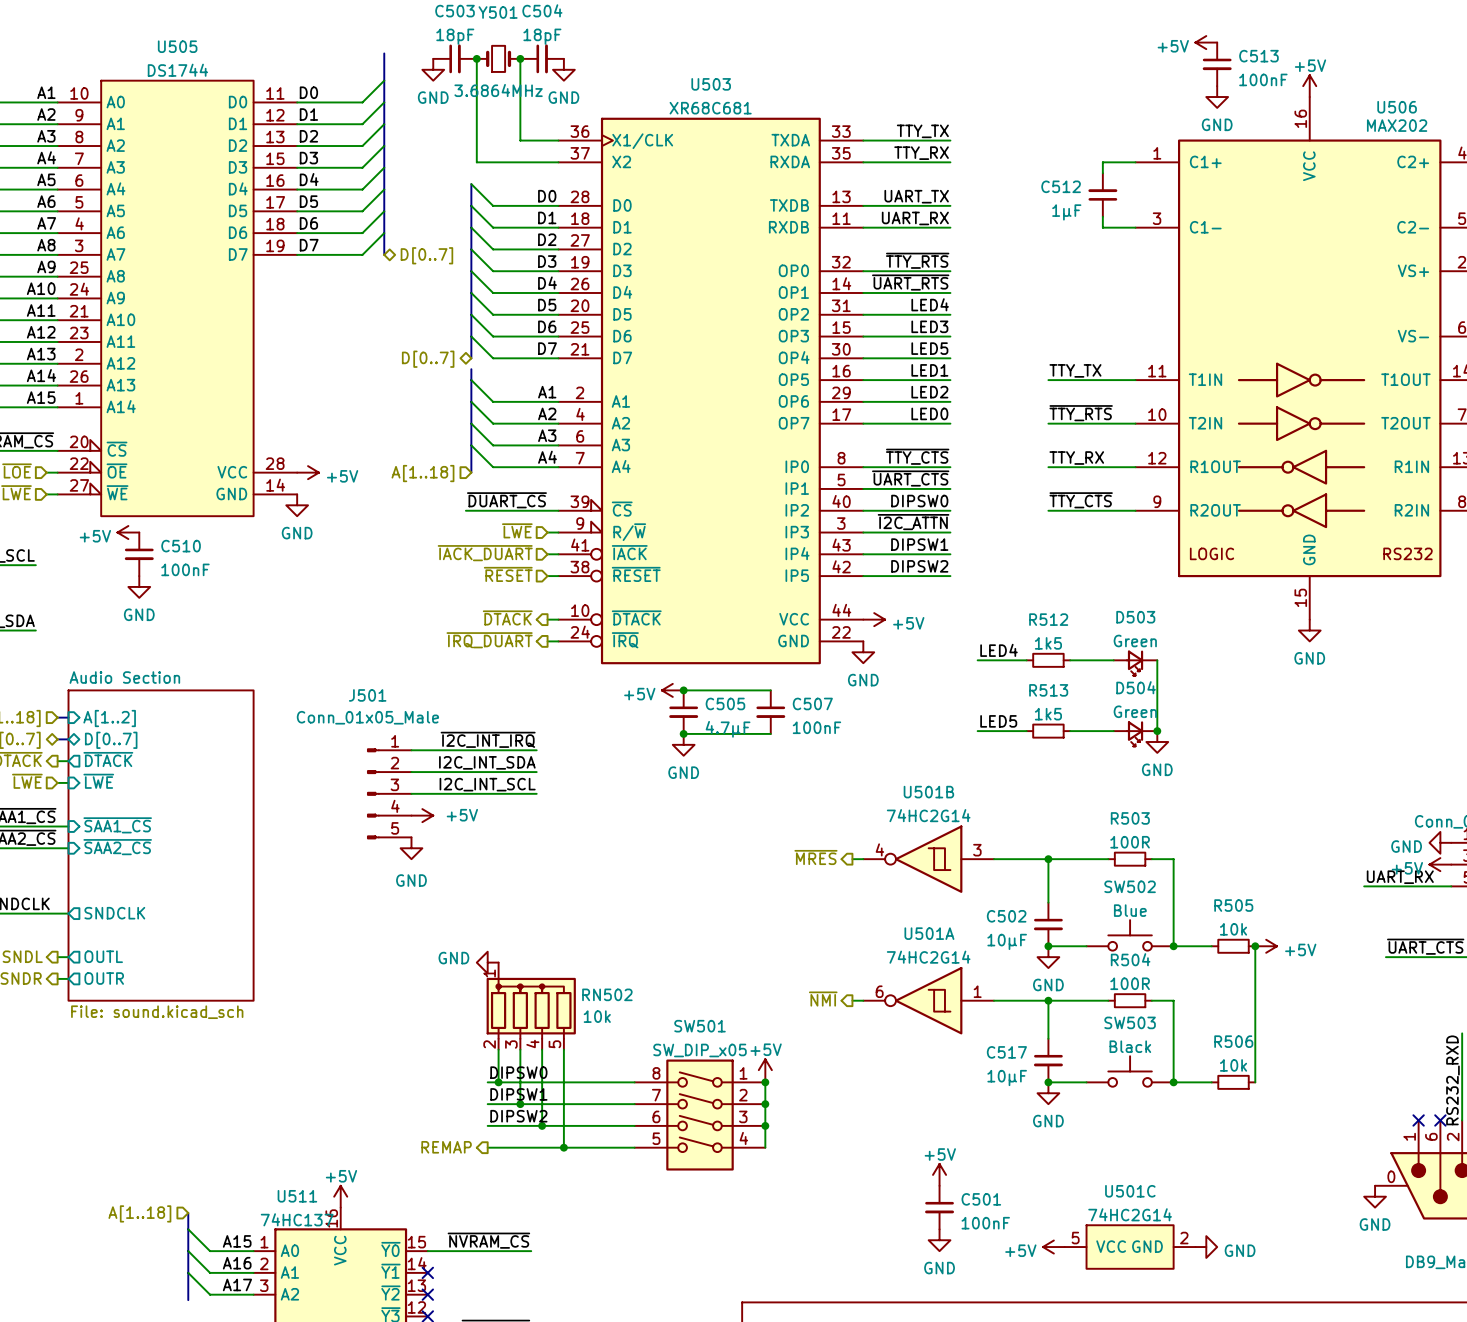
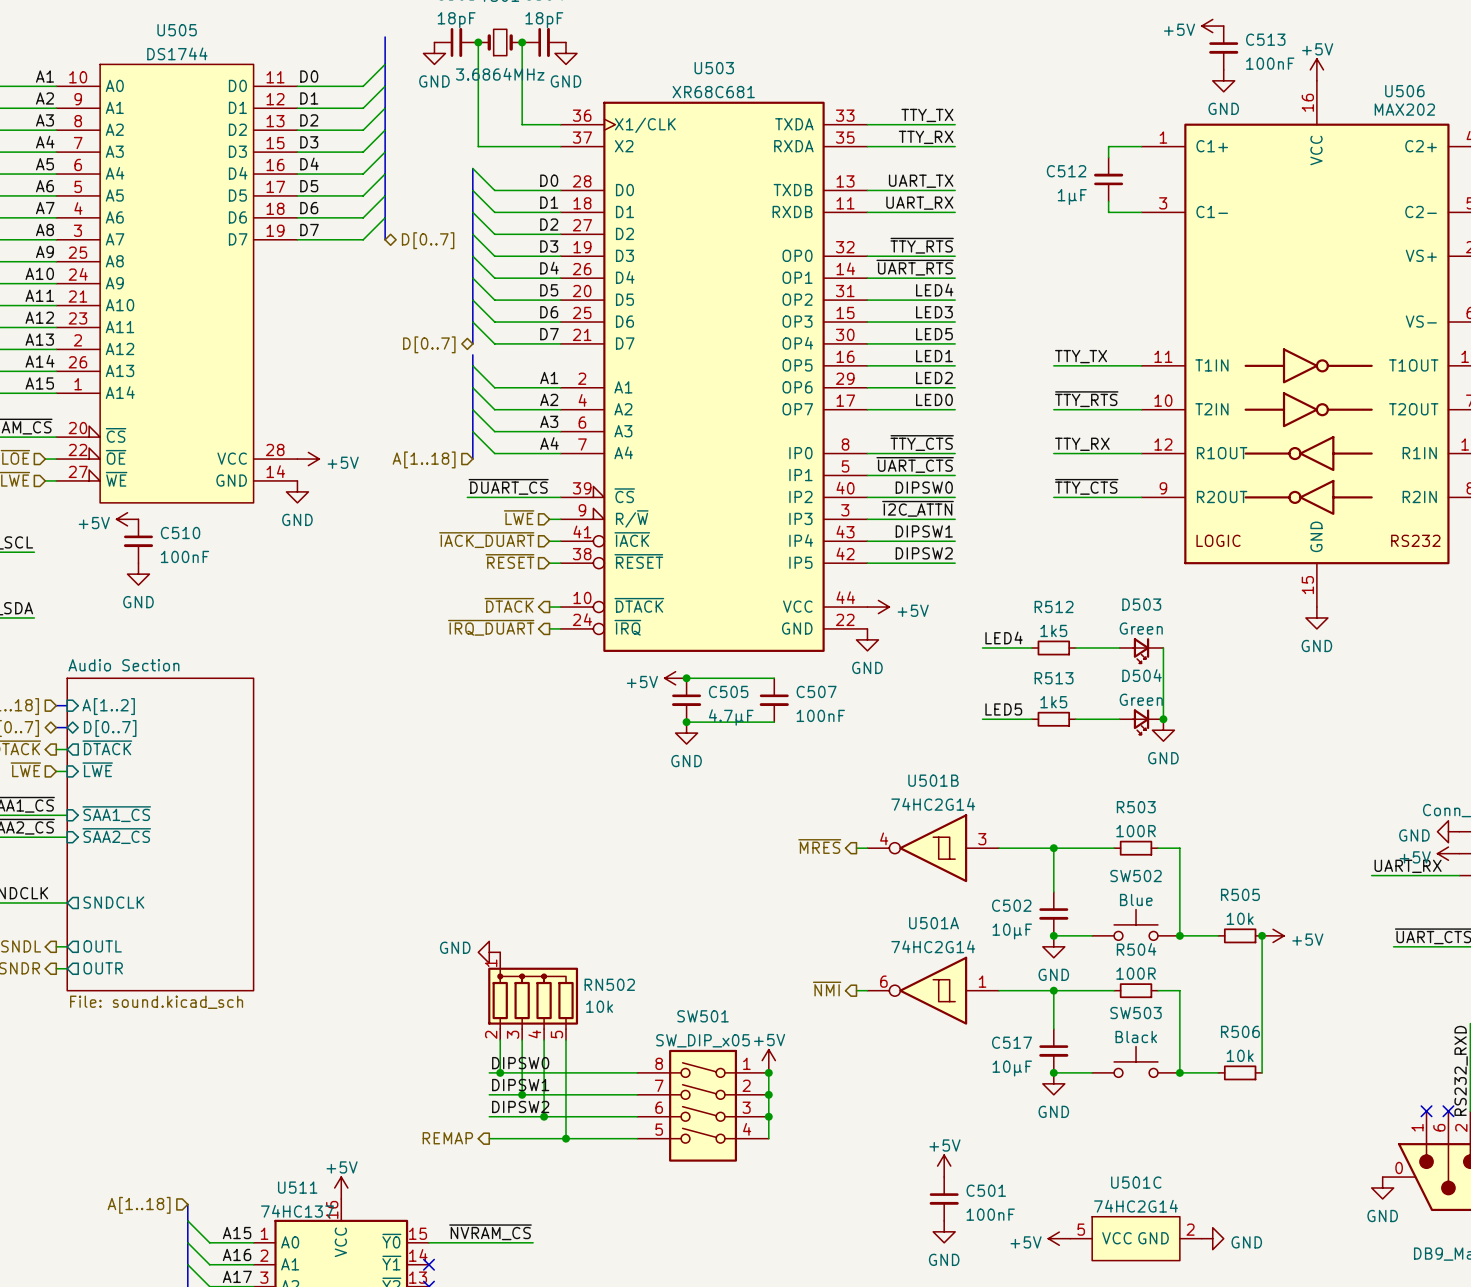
label: ~{I2C_INT_IRQ} (488, 739) -> none
wire: (411, 750) (536, 750) -> none
label: I2C_INT_SDA (487, 762) -> none
wire: (411, 772) (536, 772) -> none
label: I2C_INT_SCL (487, 784) -> none
J501: Conn_01x05_Male (389, 793) -> none
wire: (411, 793) (536, 793) -> none
power symbol: +5V (422, 815) -> none
power symbol: GND (411, 848) -> none

